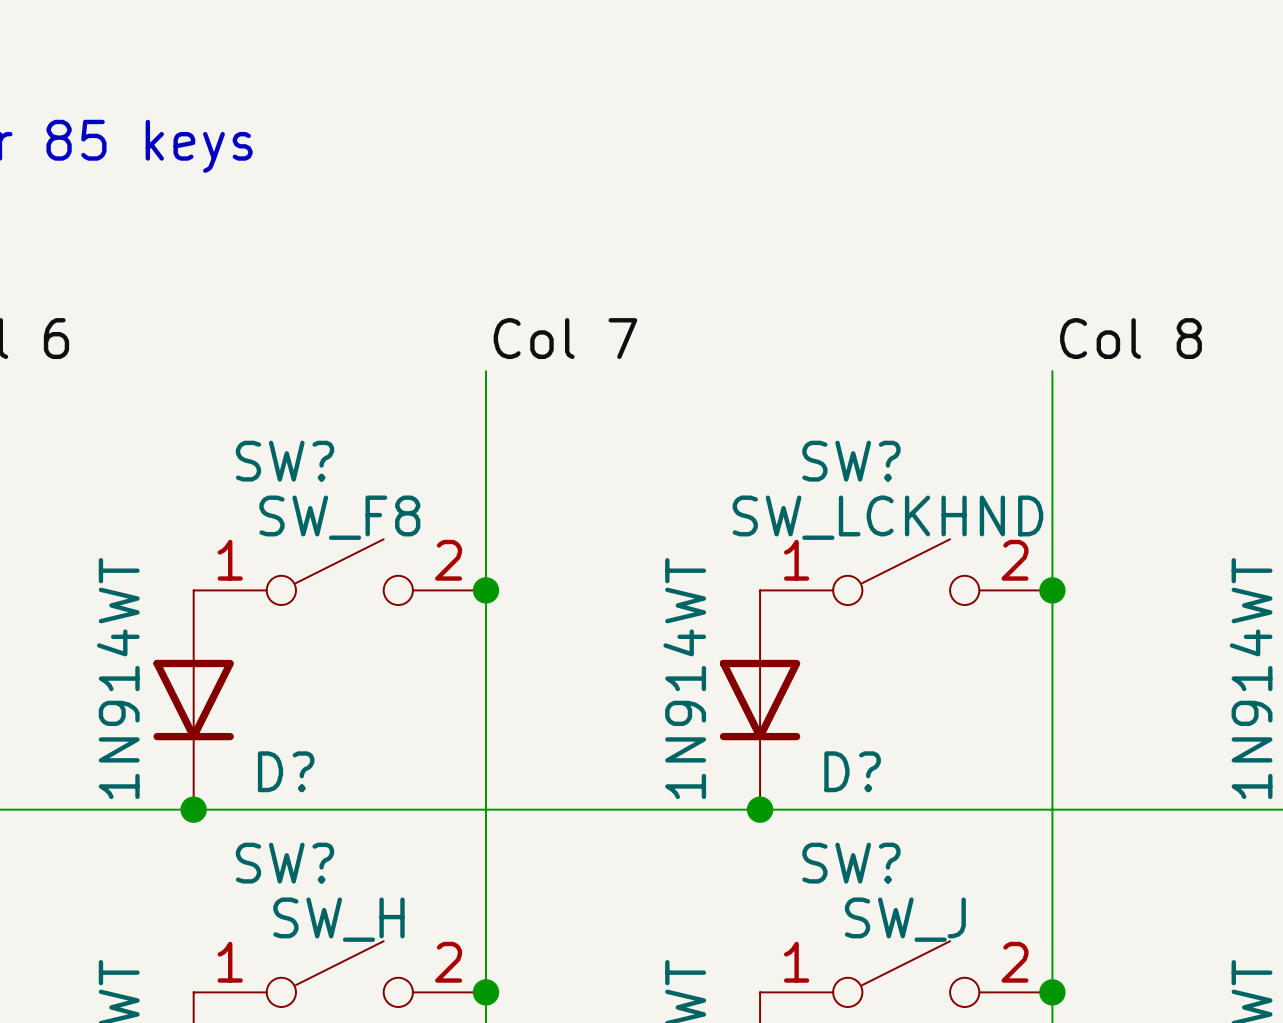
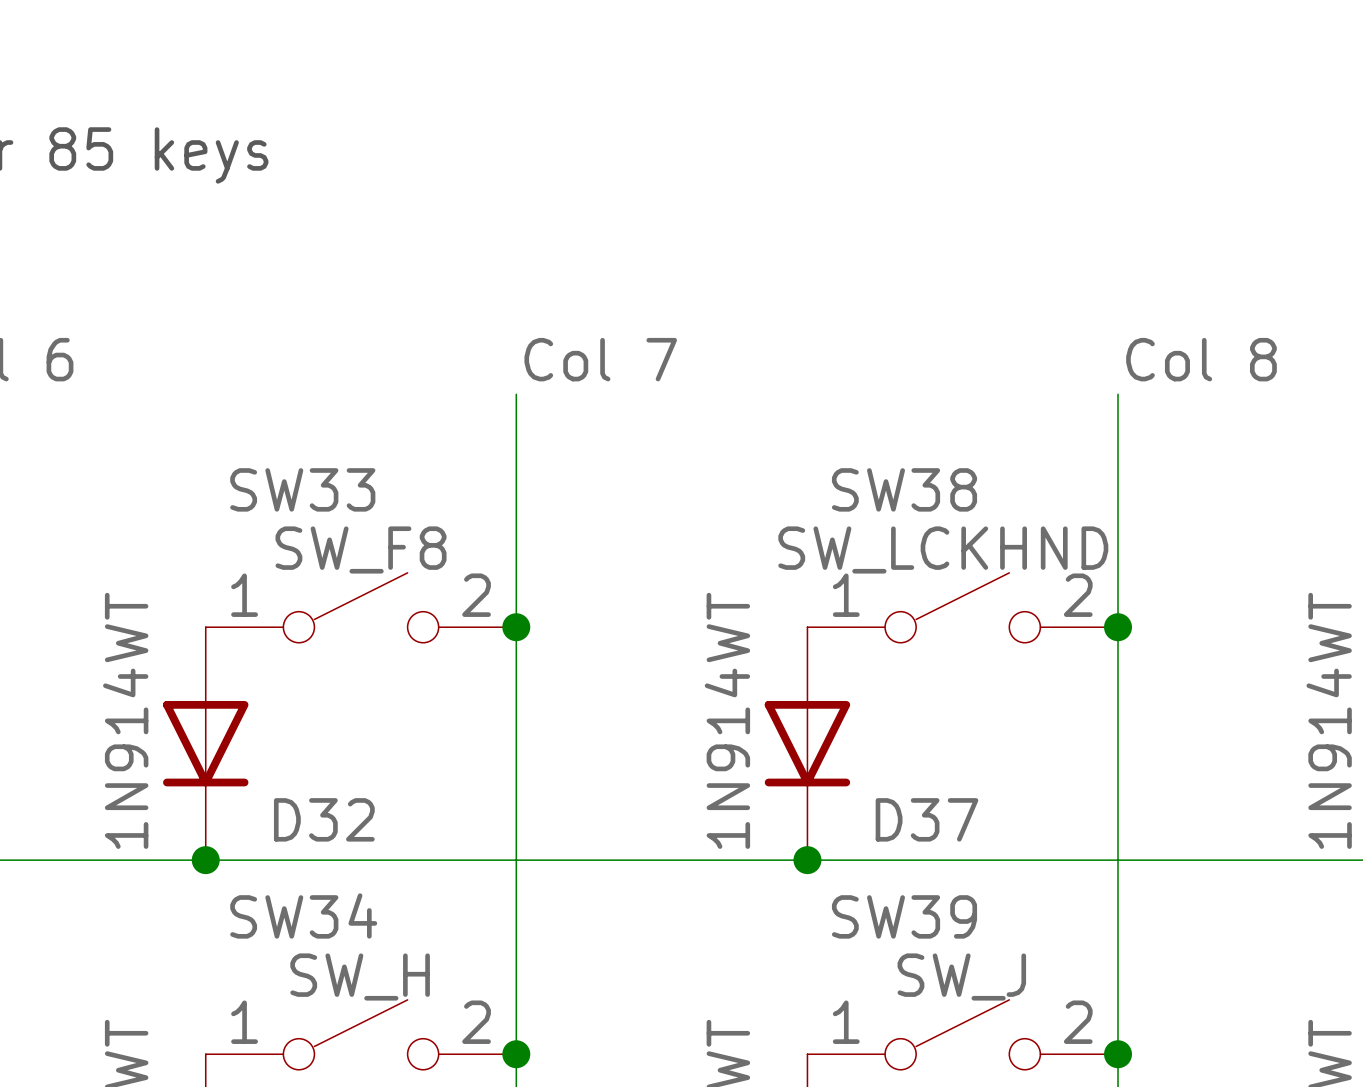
SW? name: SW? (285, 461) -> SW33 (302, 489)
SW? name: SW? (851, 461) -> SW38 (904, 489)
D? name: D? (286, 771) -> D32 (324, 819)
D? name: D? (852, 771) -> D37 (926, 819)
SW? name: SW? (285, 863) -> SW34 (303, 915)
SW? name: SW? (851, 863) -> SW39 (904, 916)

